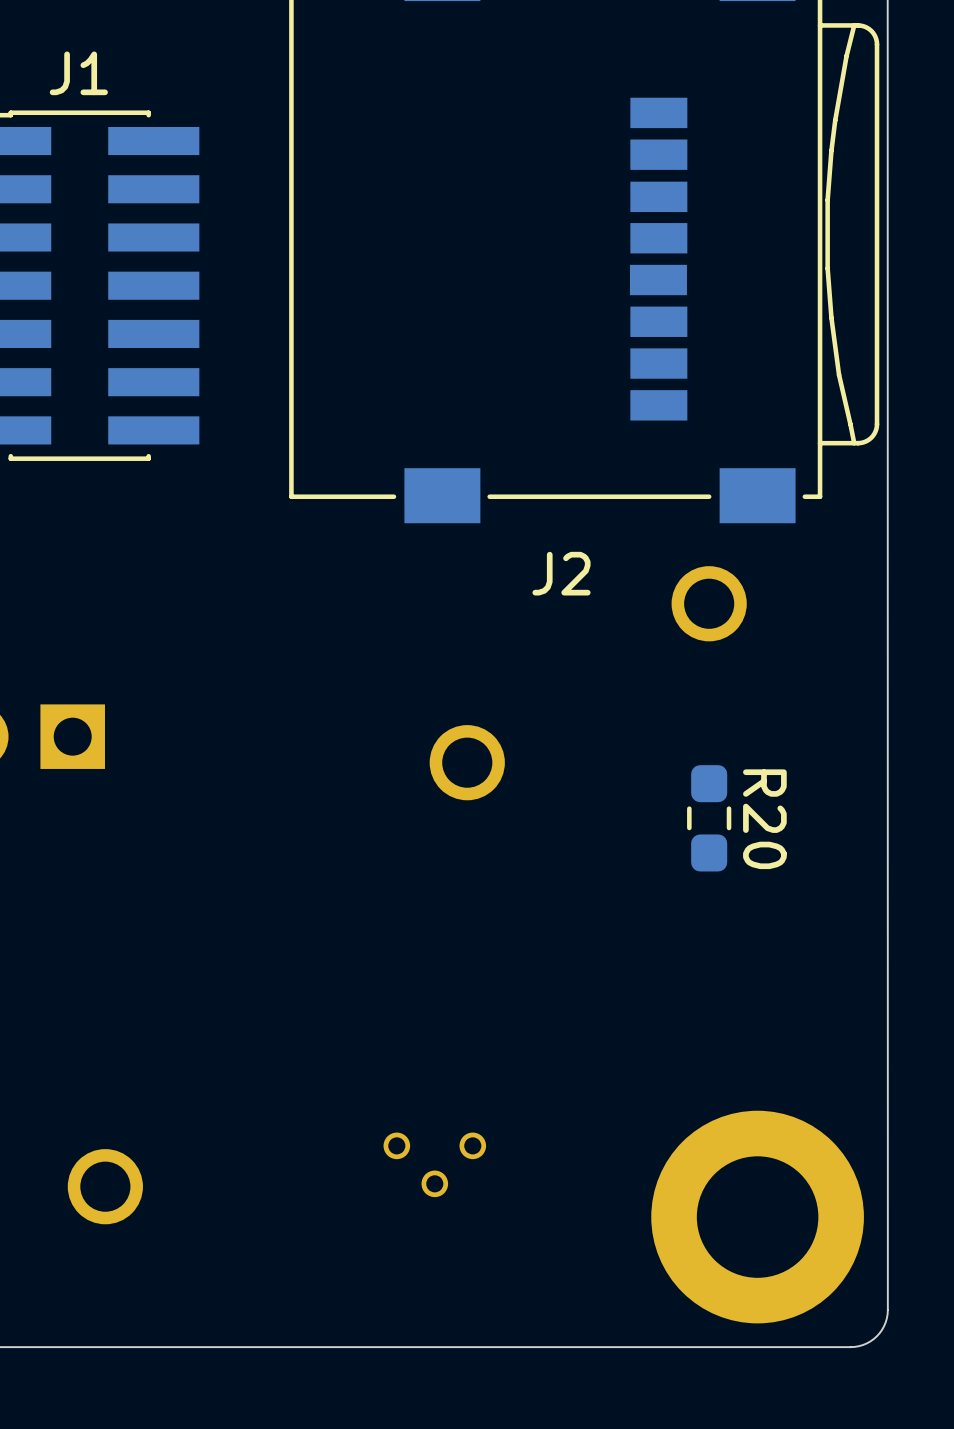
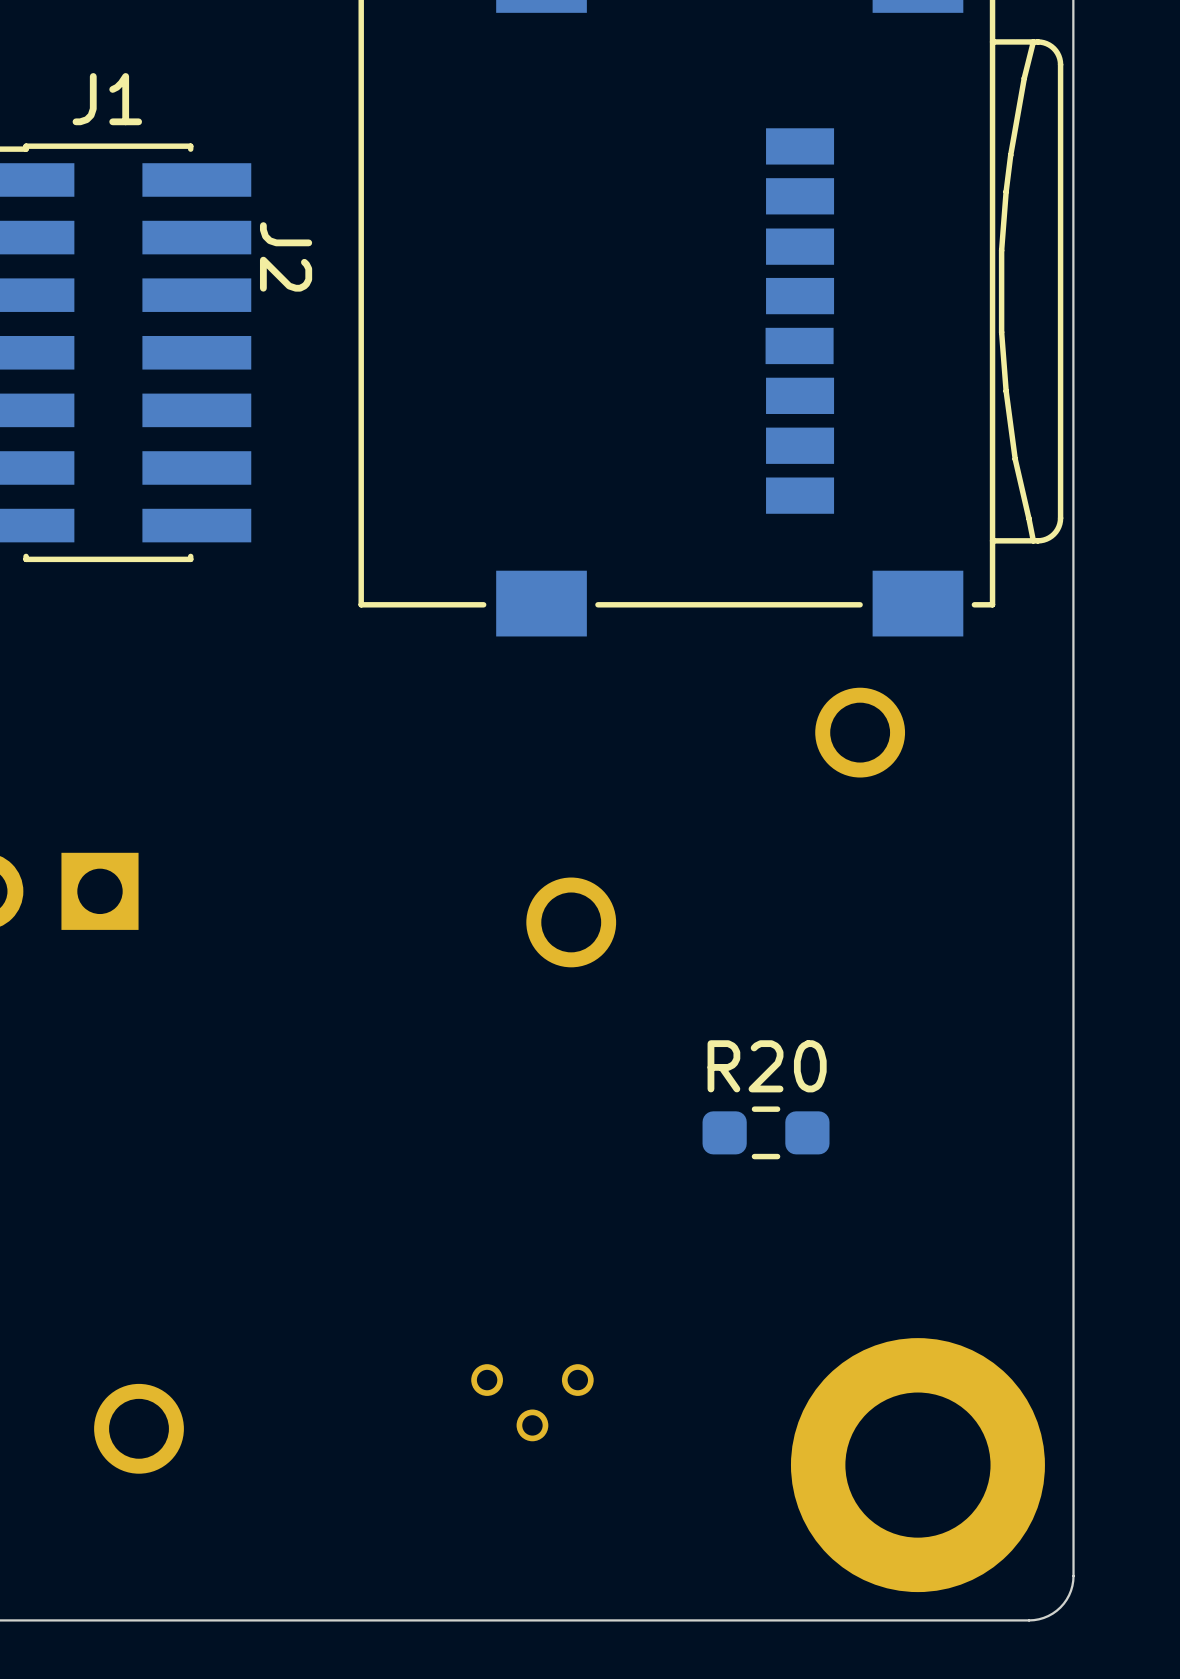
J2 name rotation: 0° (561, 573) -> 90° clockwise (286, 256)
J2 name position: J2 (561, 573) -> J2 (286, 256)
R20 rotation: 0° (709, 818) -> 90° clockwise (766, 1132)
R20 position: (709, 818) -> (766, 1132)
R20 name position: R20 (764, 819) -> R20 (767, 1066)

